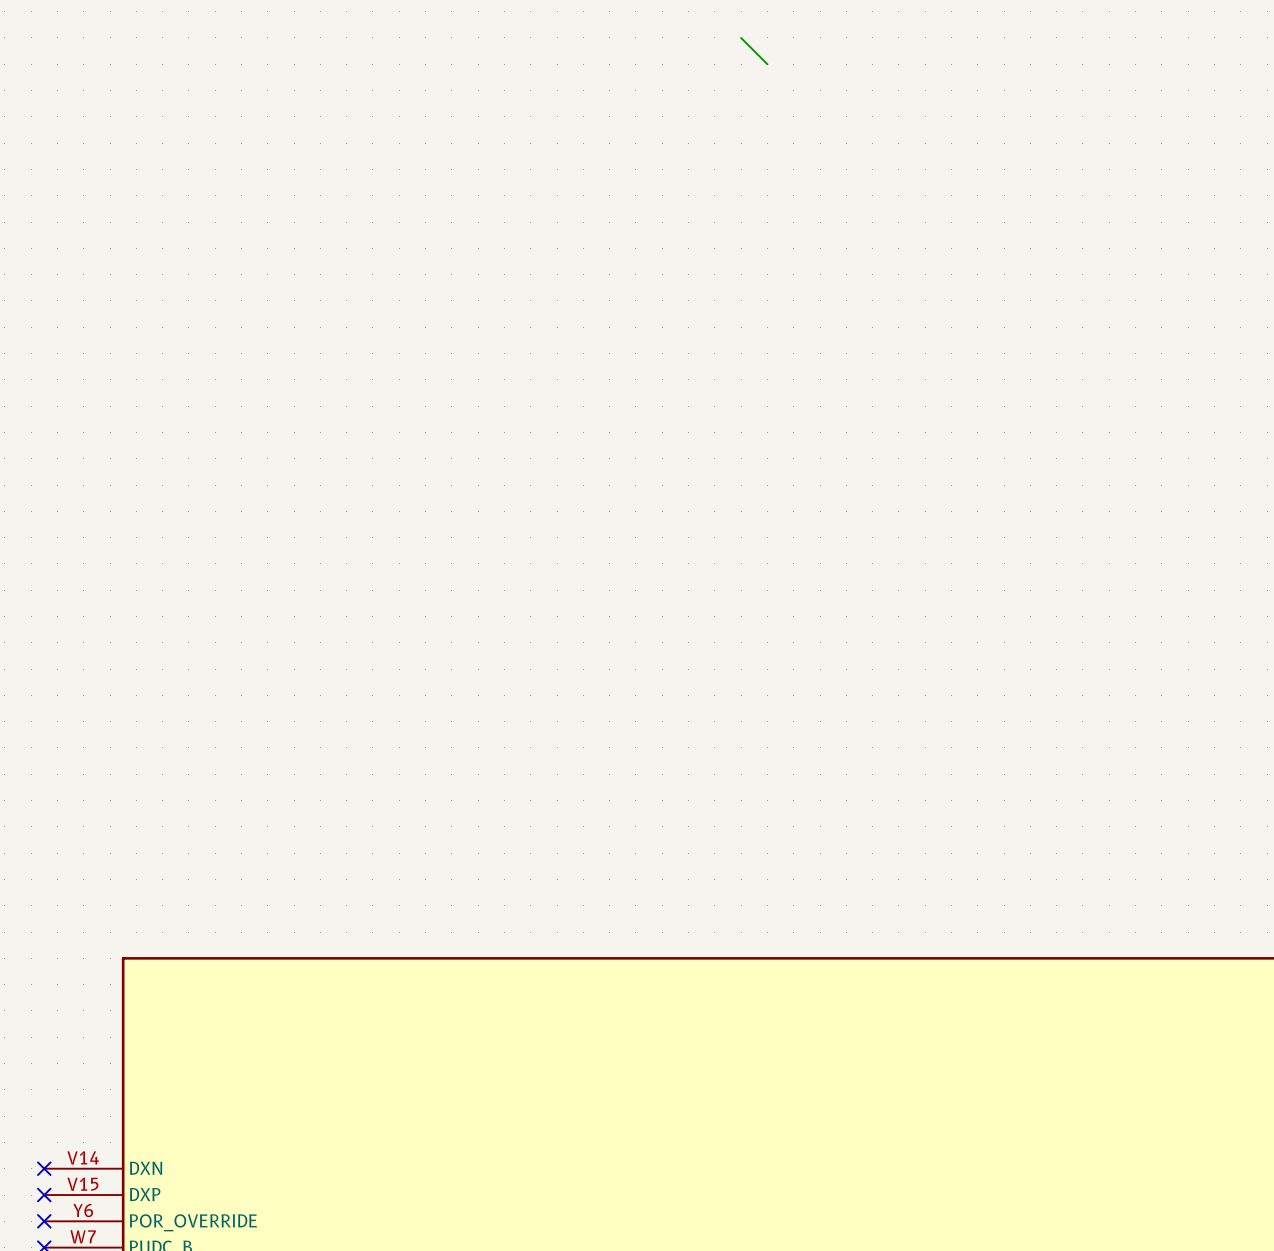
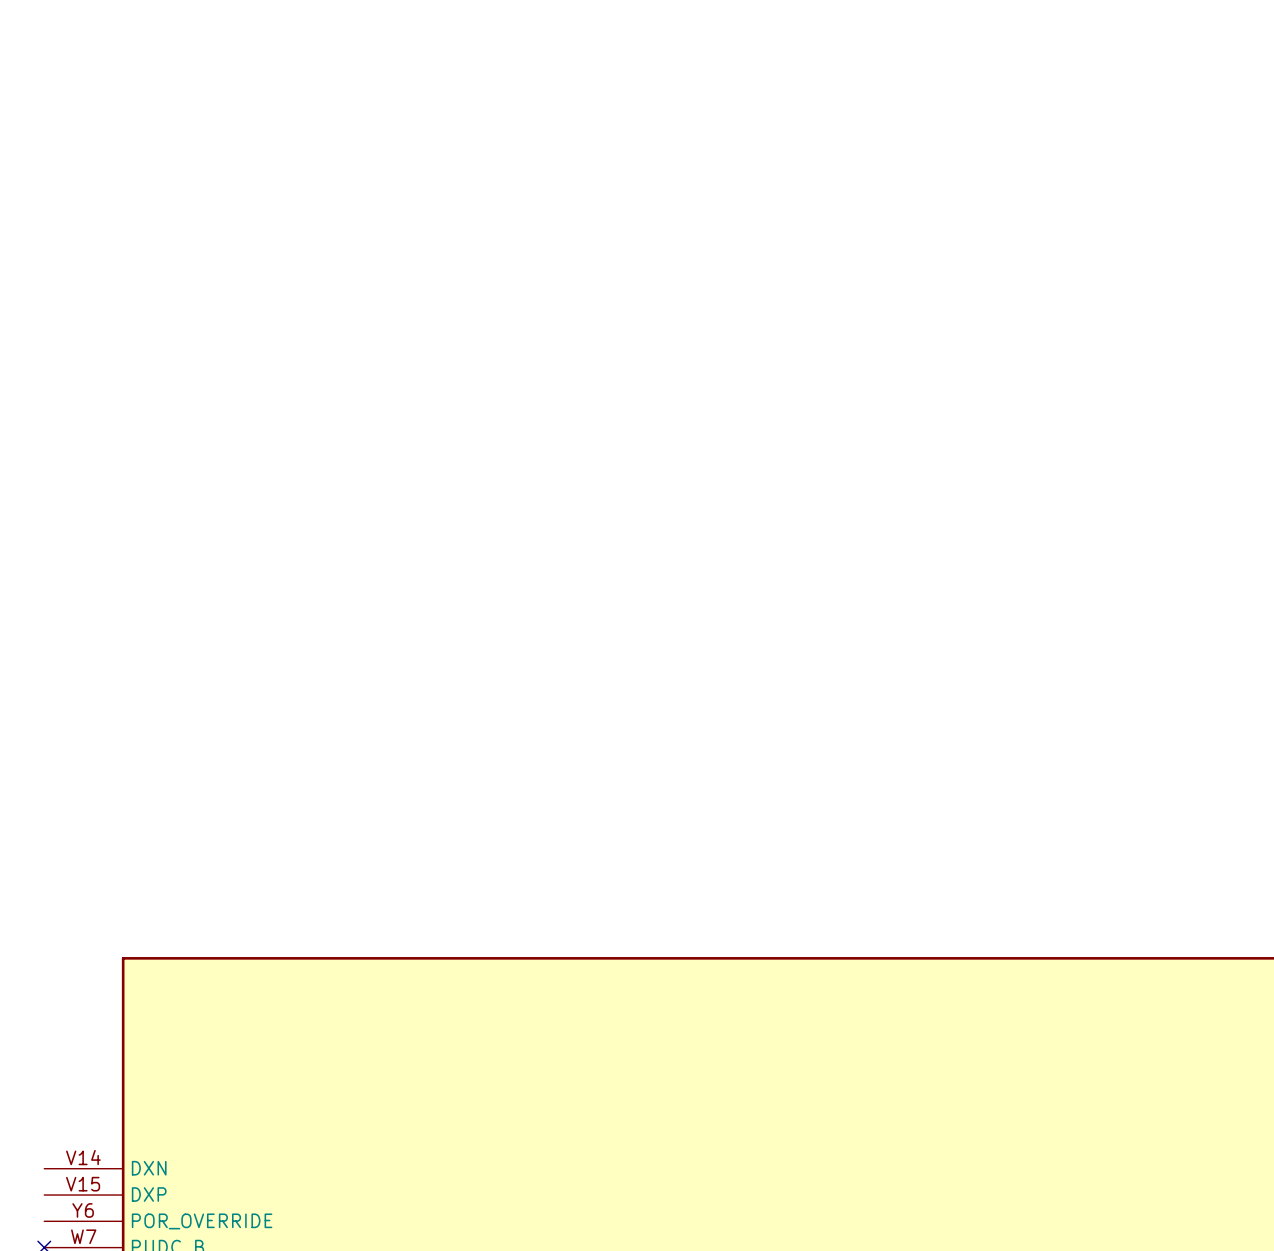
wire: (741, 37) (767, 64) -> none
no-connect mark: (44, 1168) -> none
no-connect mark: (44, 1195) -> none
no-connect mark: (44, 1221) -> none

